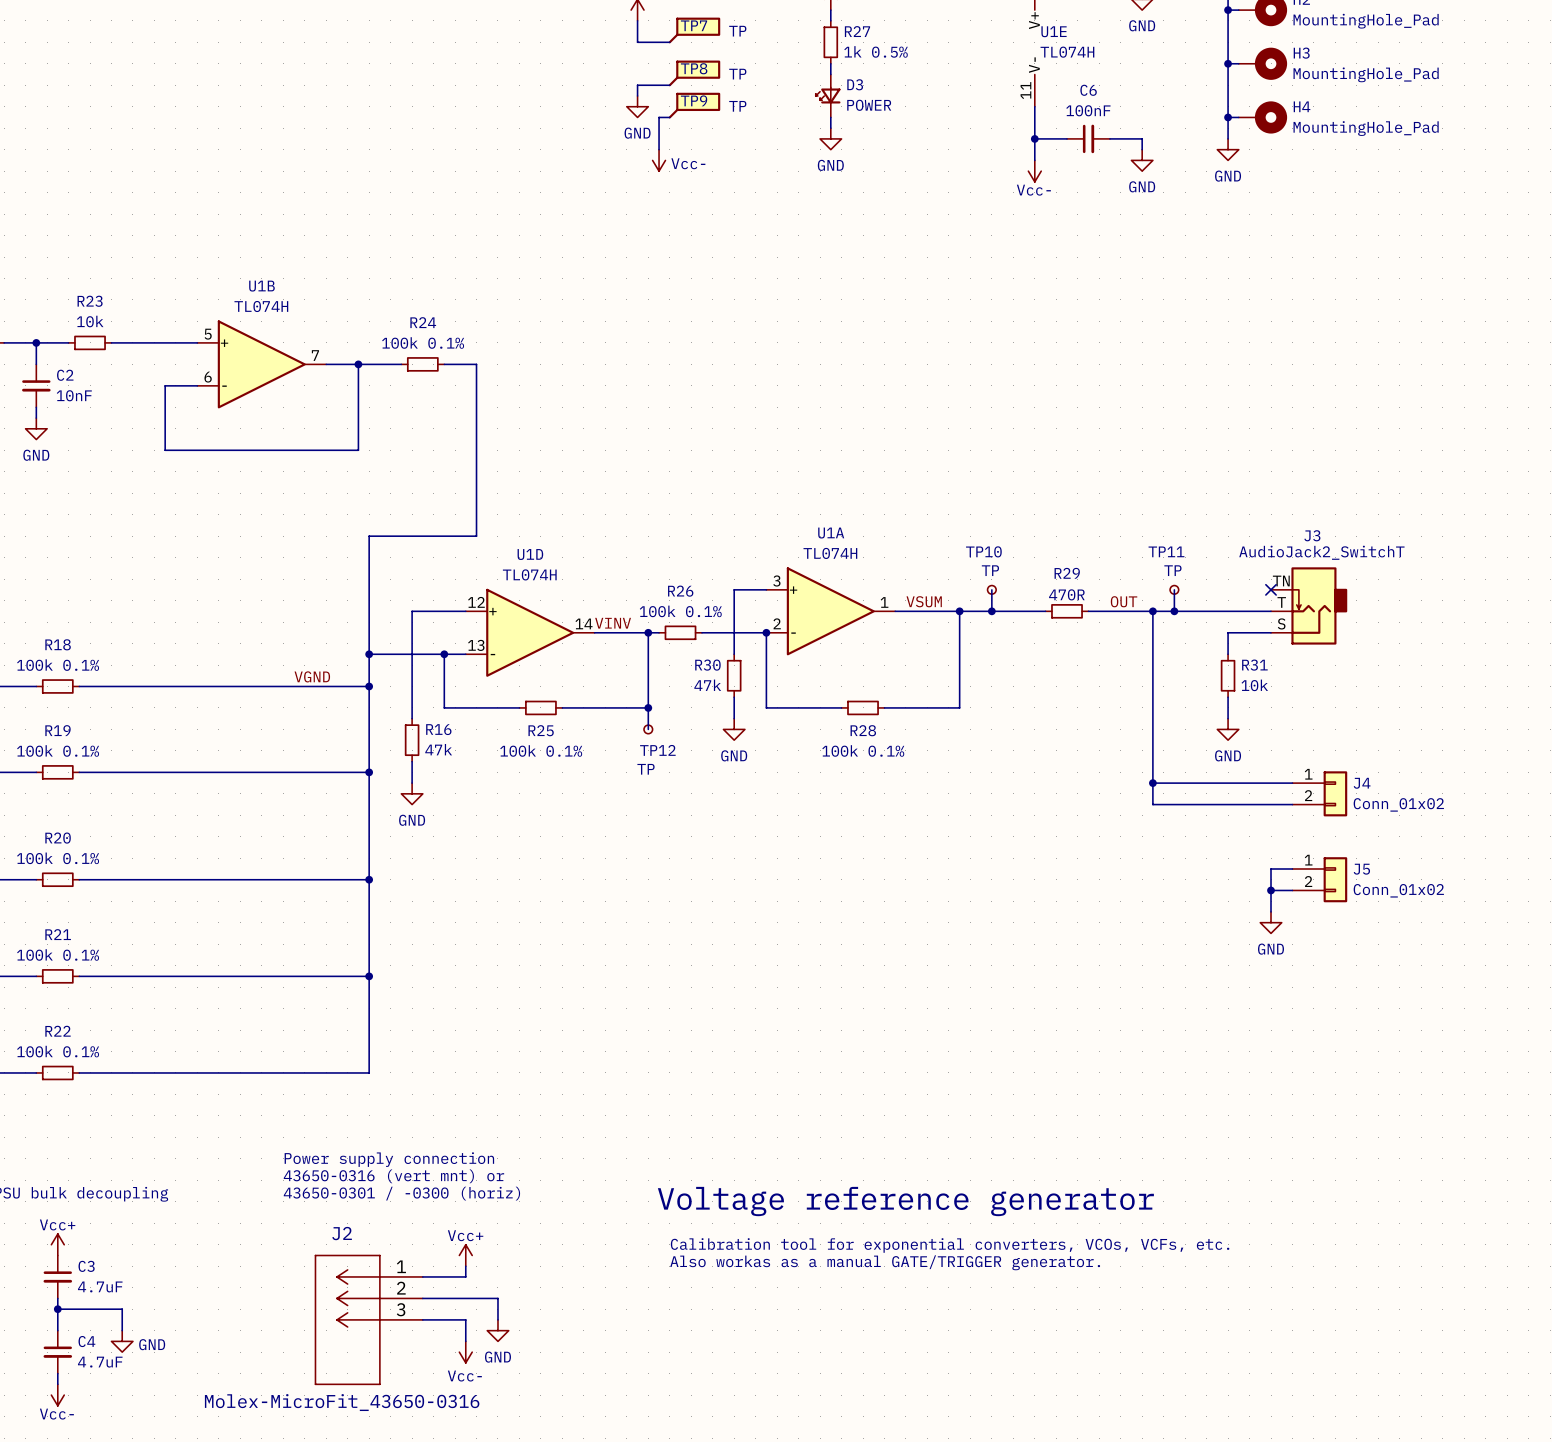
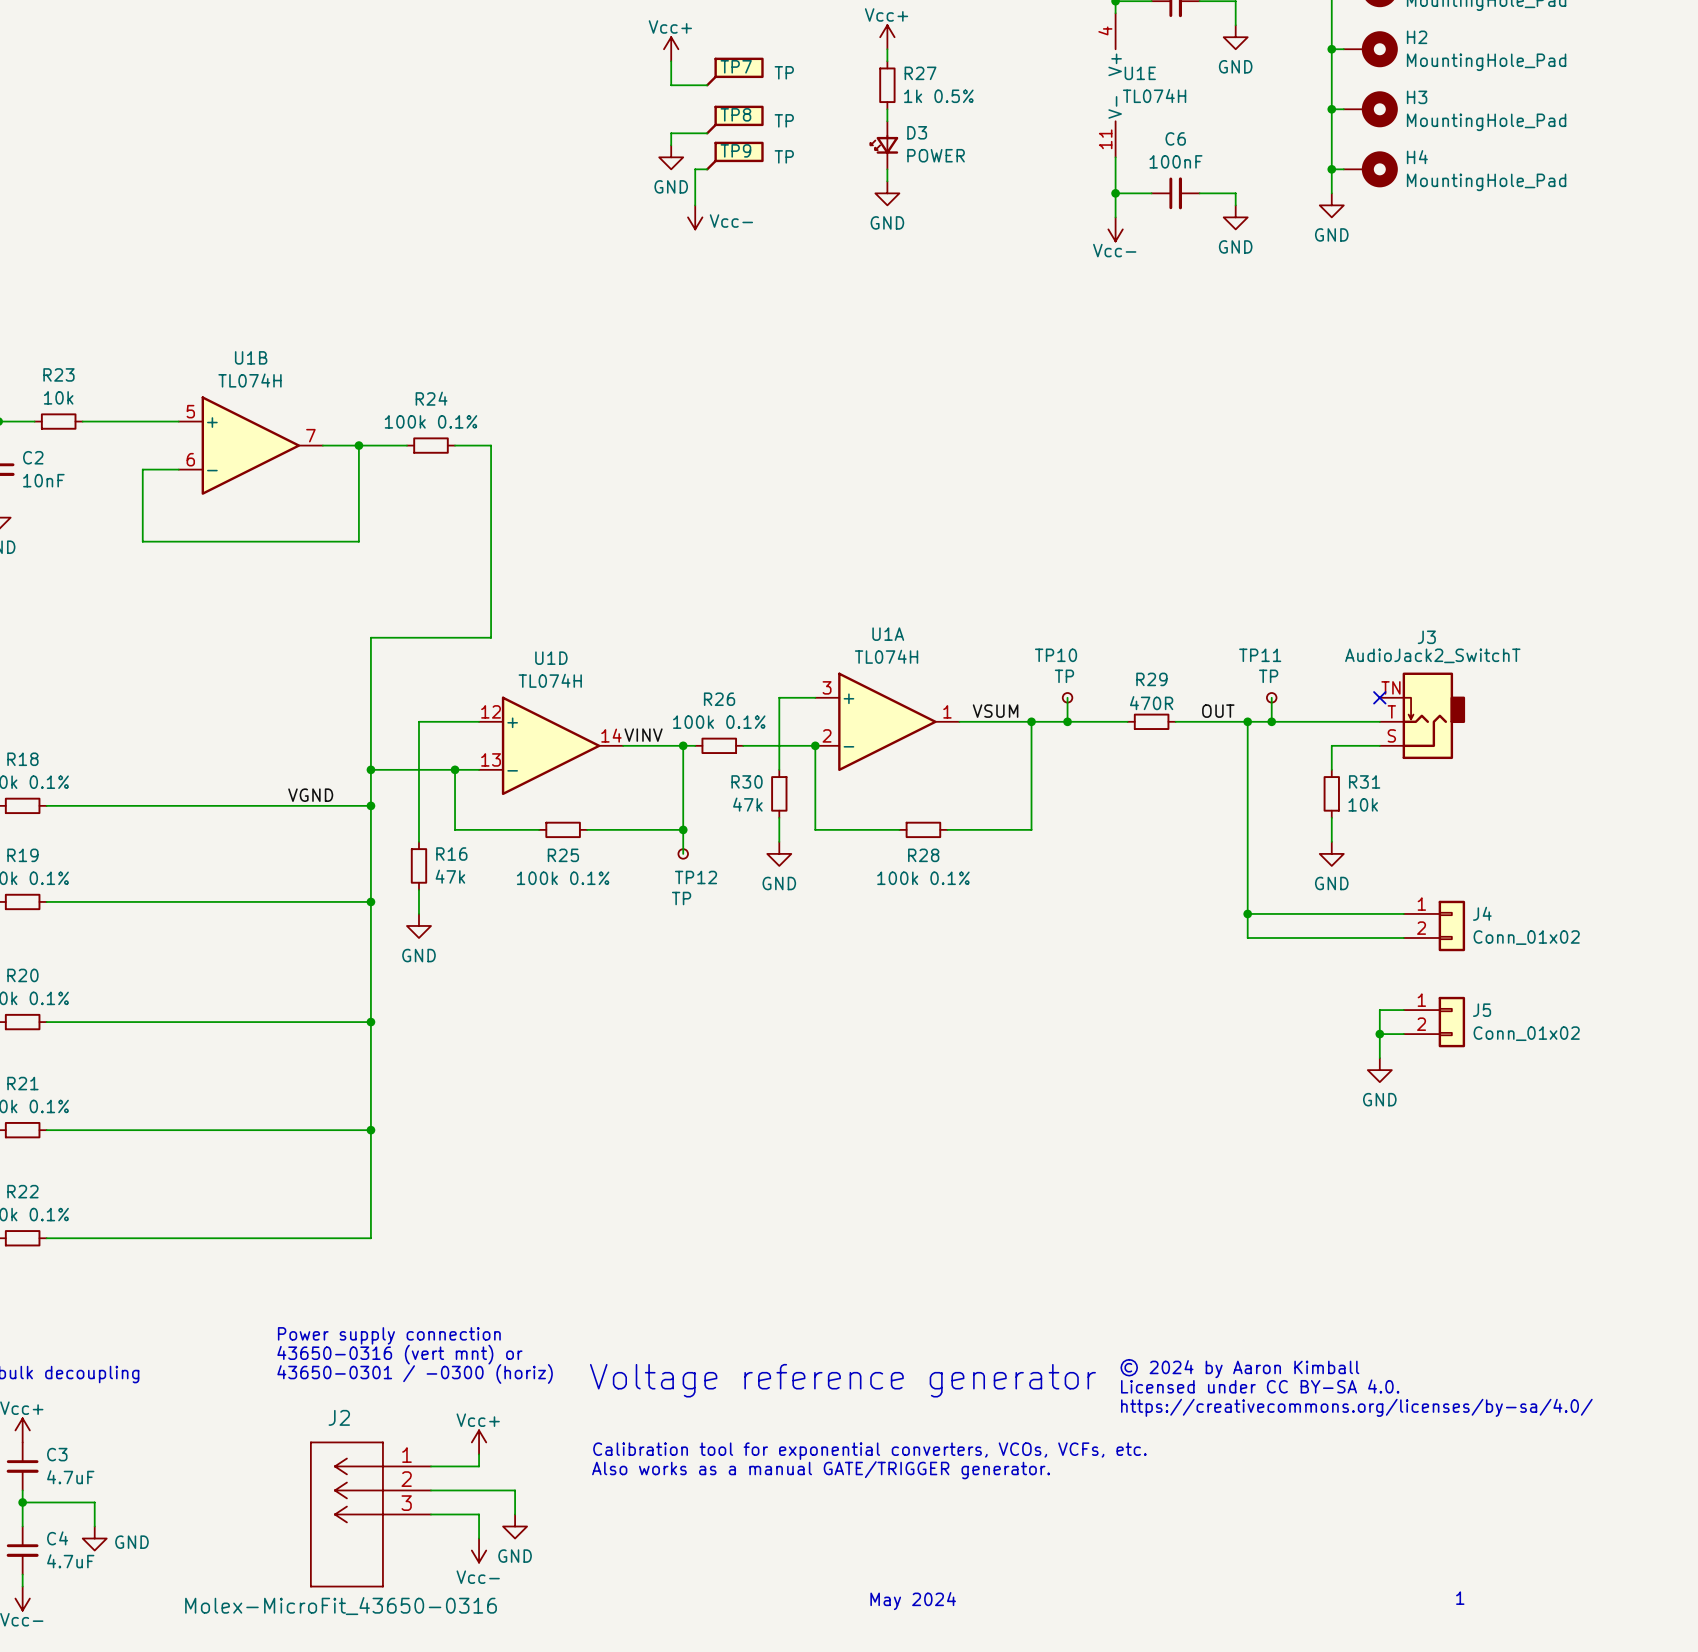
text: none -> © 2024 by Aaron Kimball (1239, 1368)
text position: Voltage reference generator (905, 1201) -> Voltage reference generator (842, 1380)
text: none -> Licensed under CC BY-SA 4.0. (1260, 1386)
text: none -> https://creativecommons.org/licenses/by-sa/4.0/ (1356, 1407)
text position: Calibration tool for exponential converters, VCOs, VCFs, etc. (950, 1245) -> Calibration tool for exponential converters, VCOs, VCFs, etc. (869, 1451)
text: Also workas as a manual GATE/TRIGGER generator. (885, 1262) -> Also works as a manual GATE/TRIGGER generator. (821, 1470)
text: none -> 1 (1460, 1598)
text: none -> May 2024 (913, 1601)

